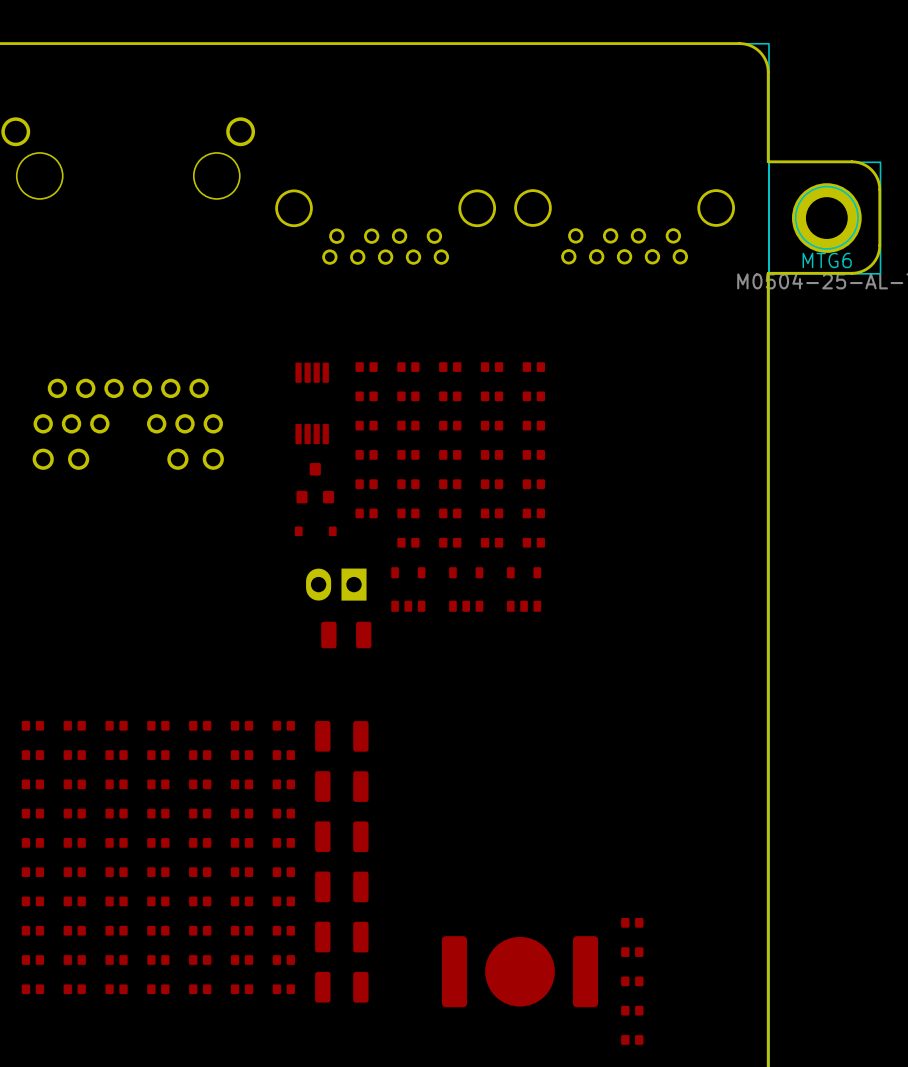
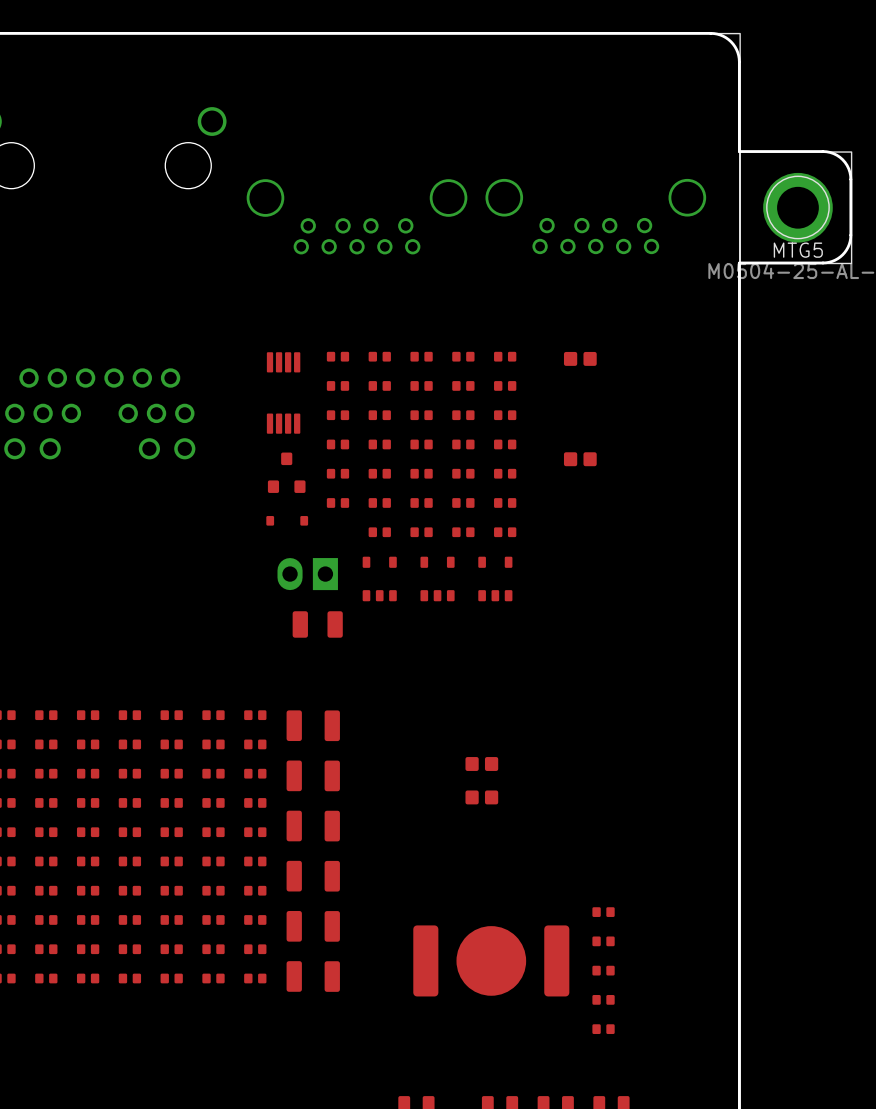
MTG6 name: MTG6 (827, 260) -> MTG5 (798, 250)
part: none -> (580, 358)
part: none -> (580, 459)
part: none -> (481, 764)
part: none -> (481, 797)

